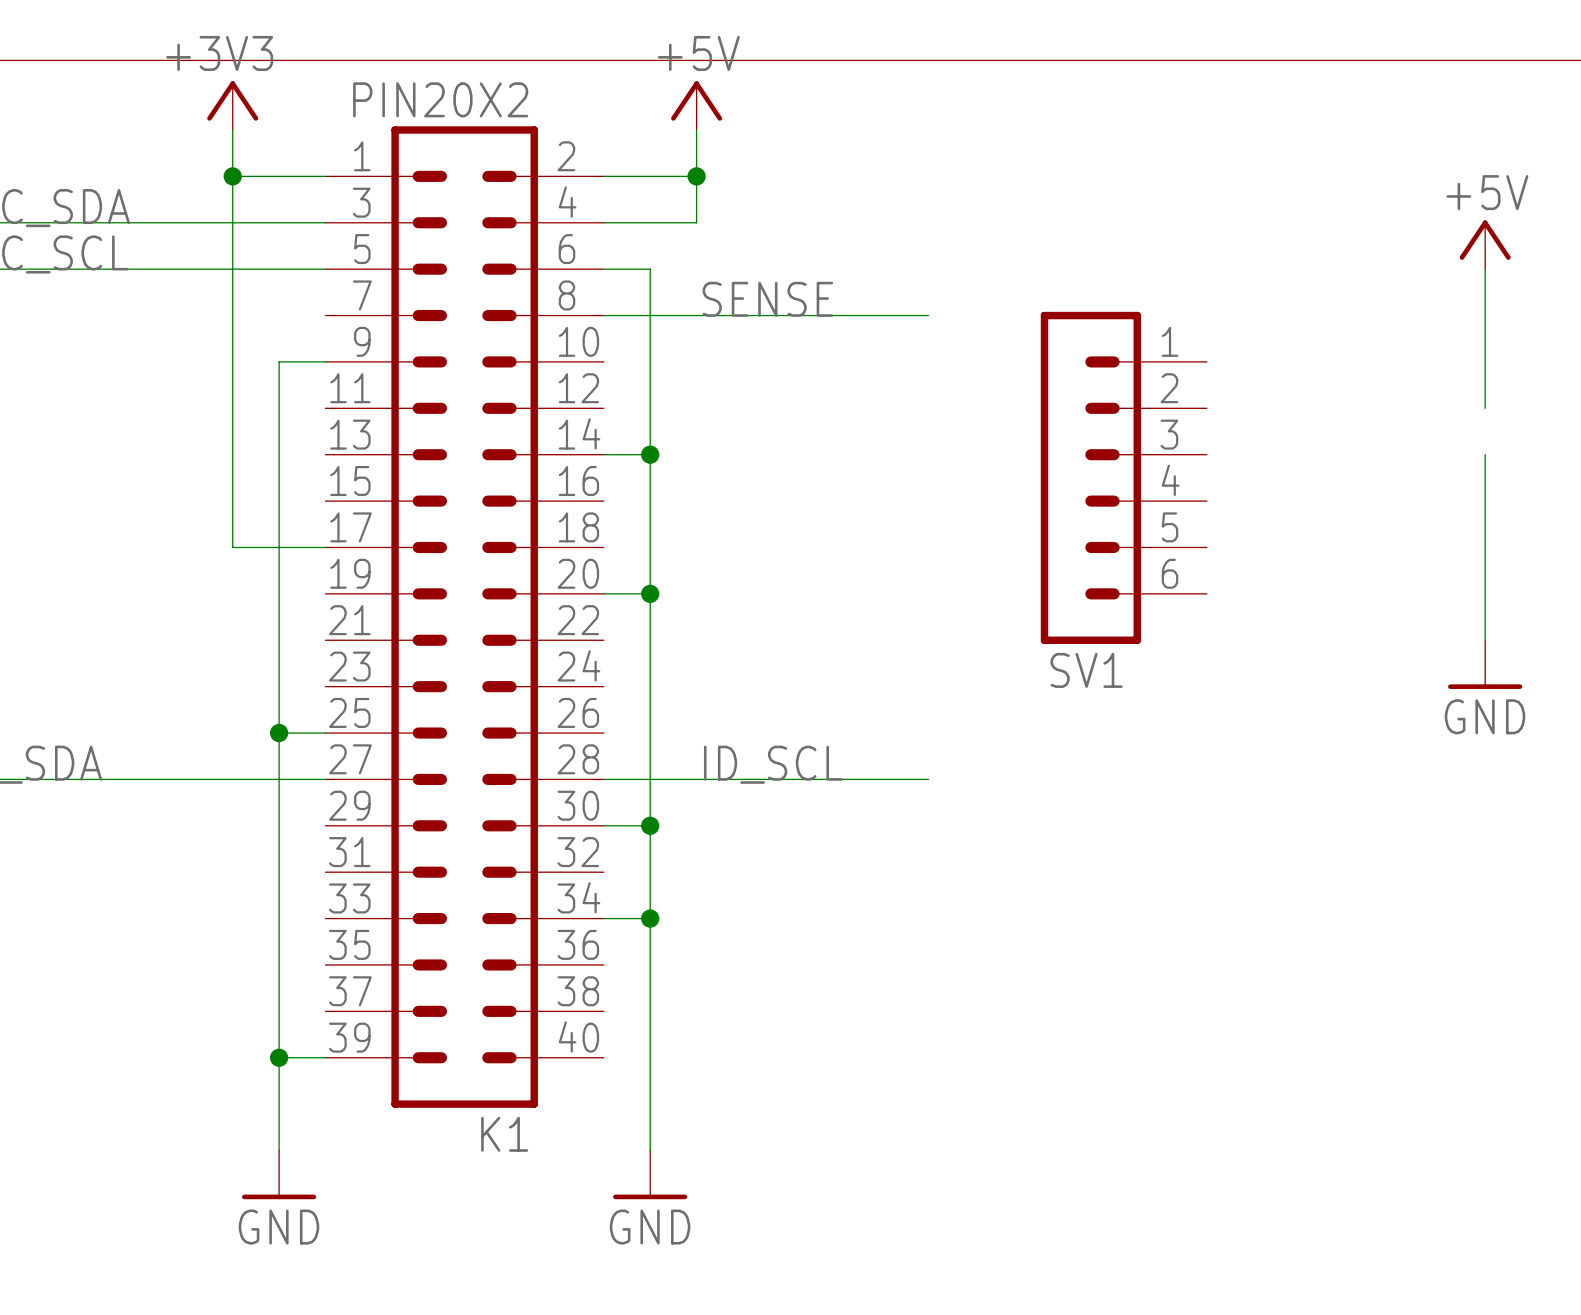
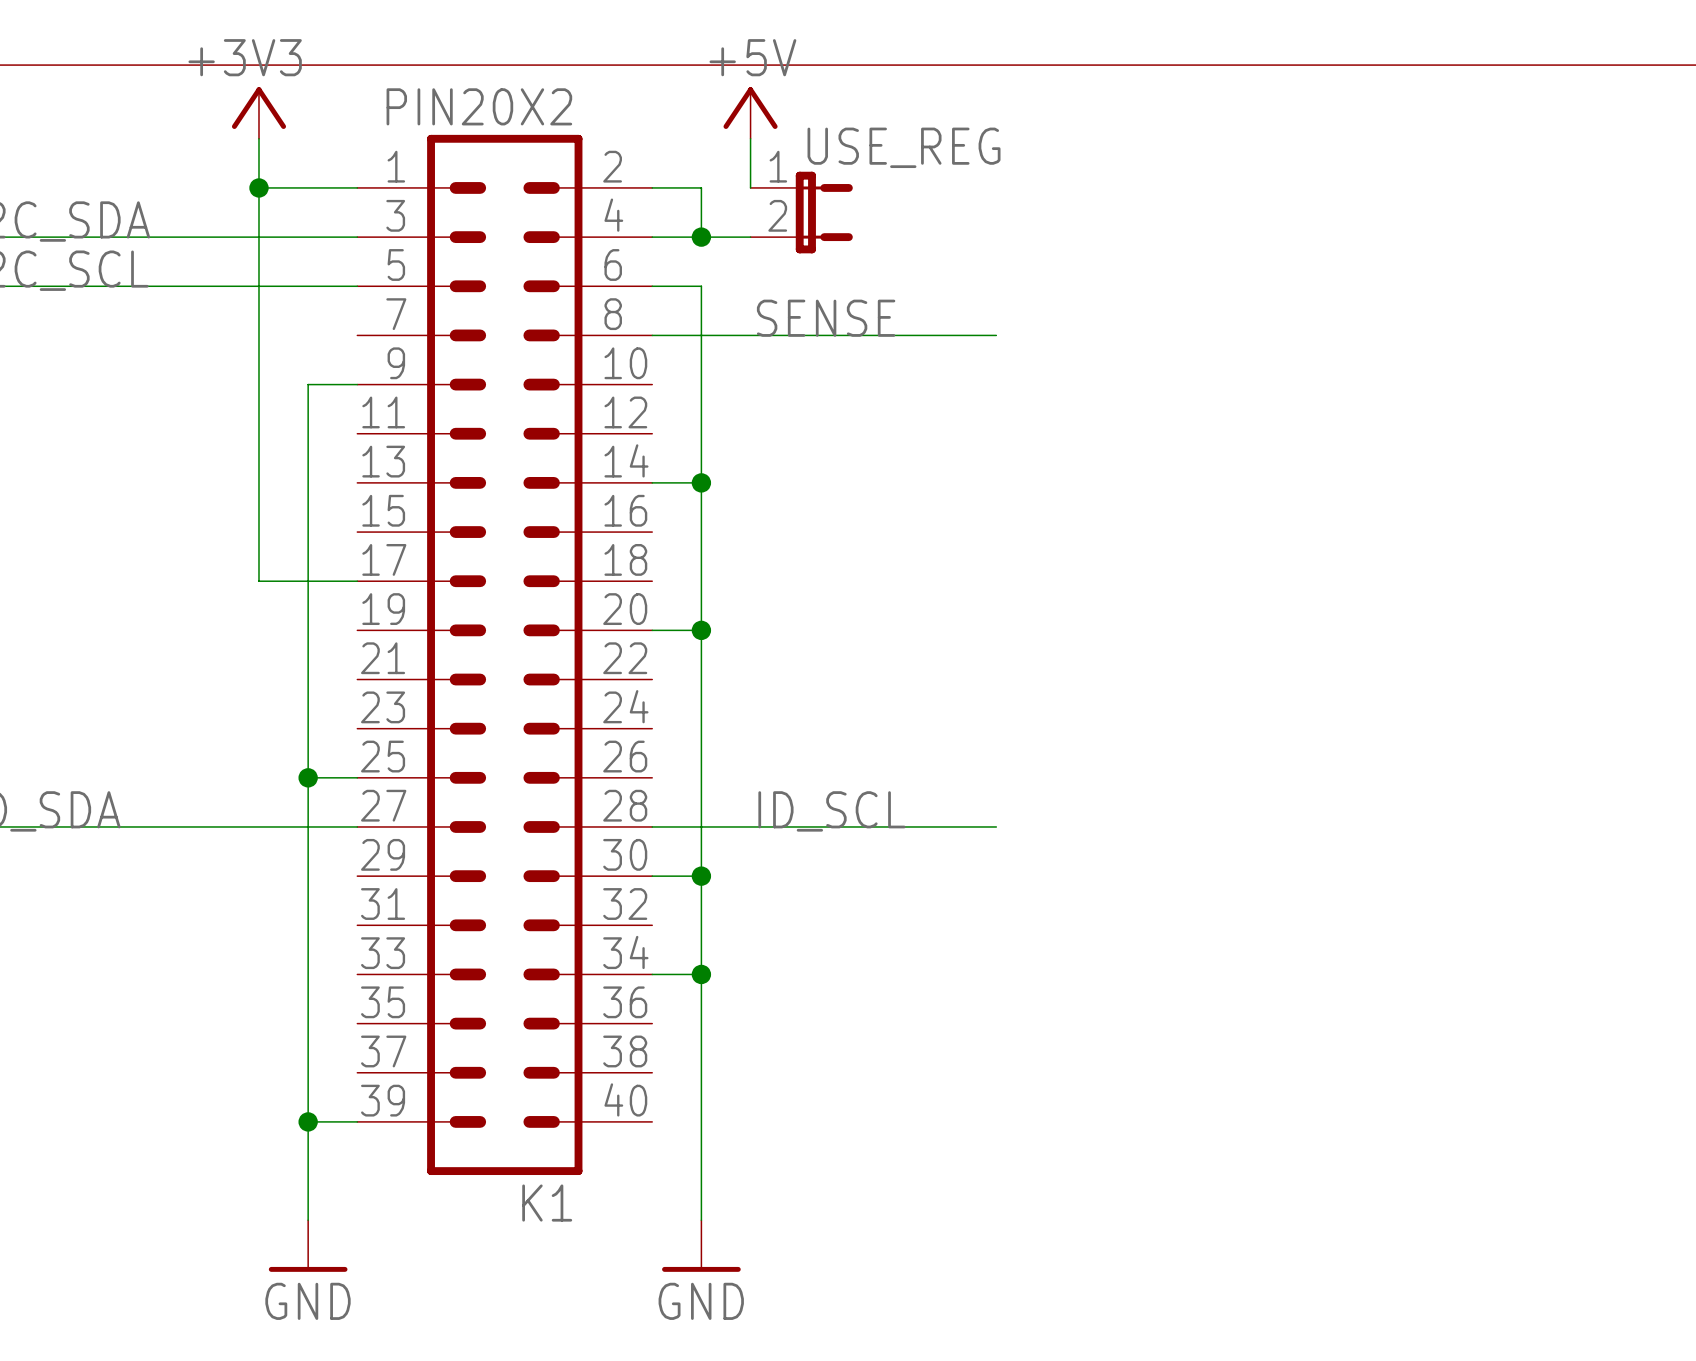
wire: (650, 176) (696, 176) (696, 222) -> (701, 187) (701, 237)
junction position: (696, 176) -> (701, 237)
USE_REG: none -> (801, 212)
power symbol: +5V (1485, 244) -> none
wire: (1485, 269) (1485, 408) -> none
wire: (1485, 454) (1485, 640) -> none
SV1: (1123, 477) -> none
power symbol: GND (1485, 664) -> none

